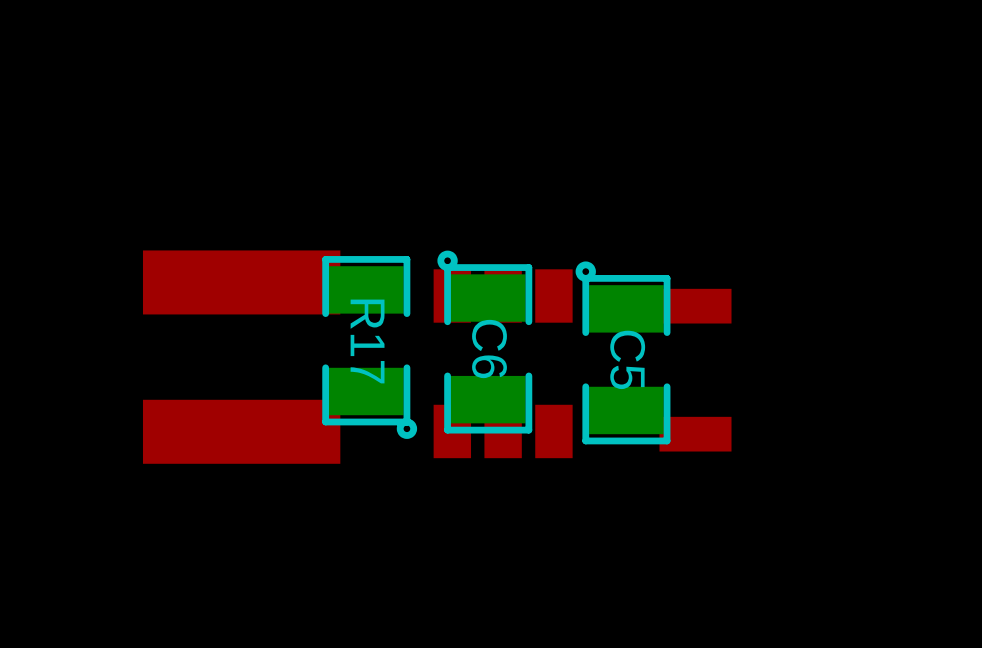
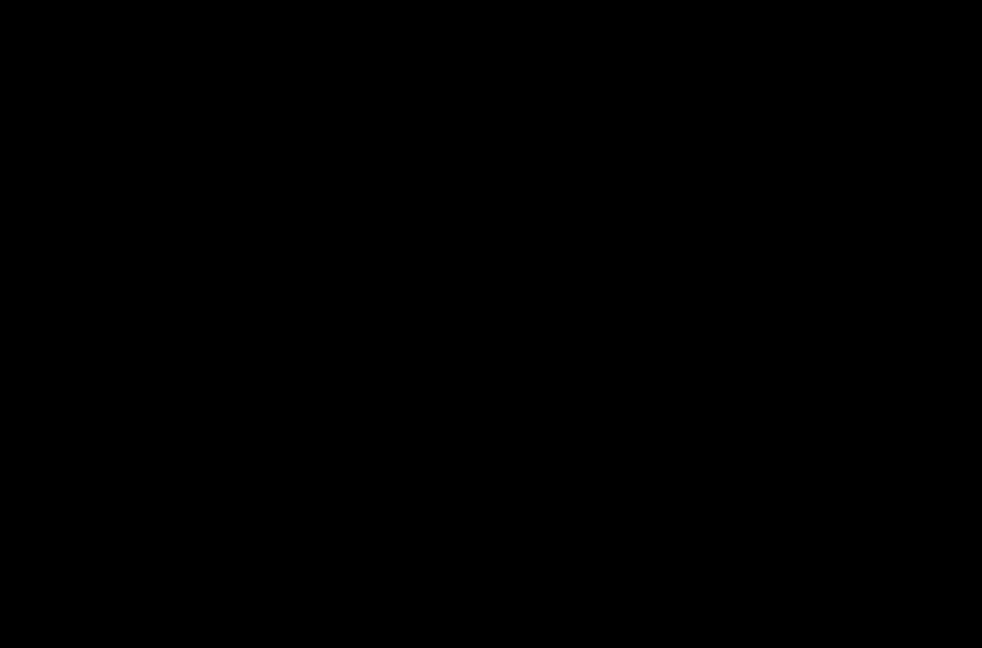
C6: (484, 342) -> none
R17: (369, 347) -> none
C5: (623, 352) -> none
part: (241, 357) -> none
part: (503, 363) -> none
part: (695, 370) -> none

